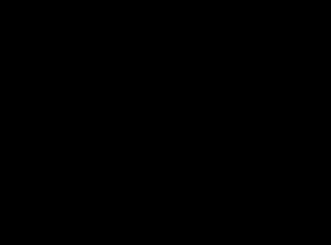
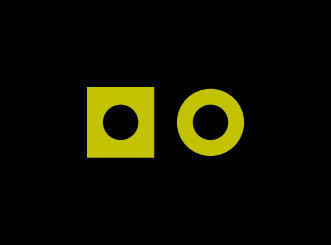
part: none -> (165, 122)

